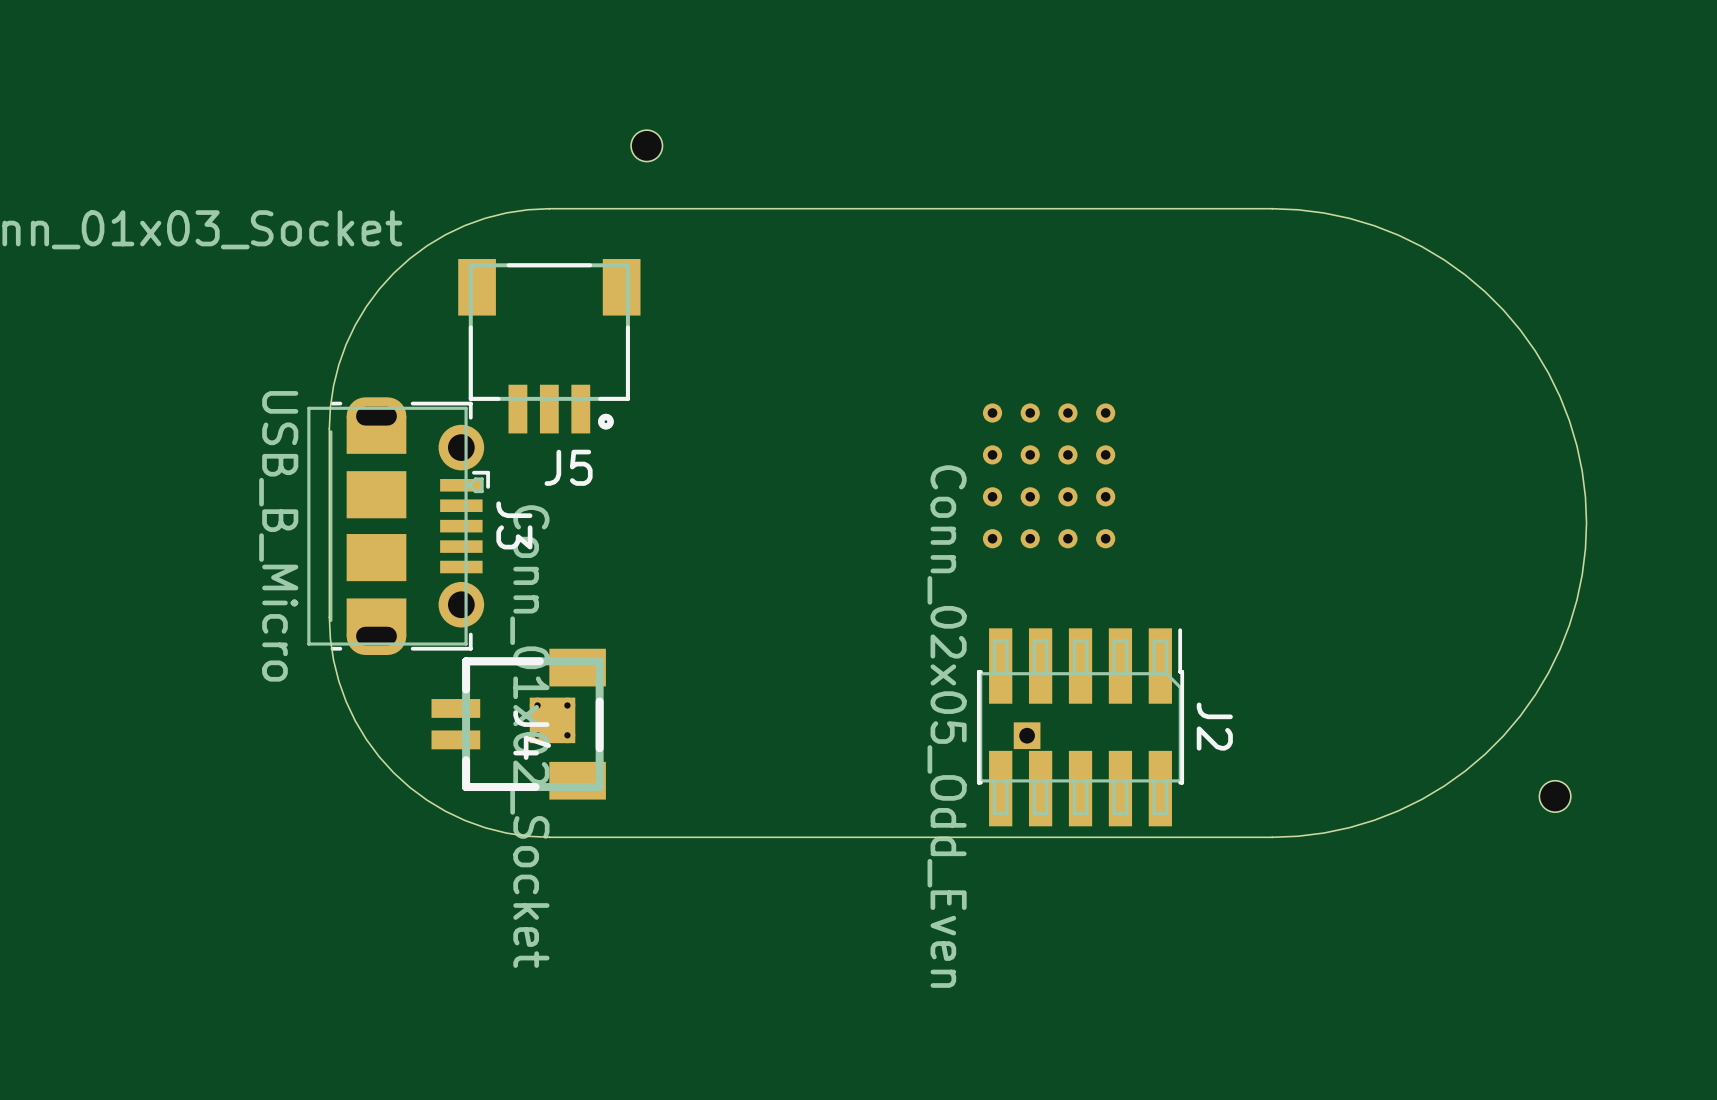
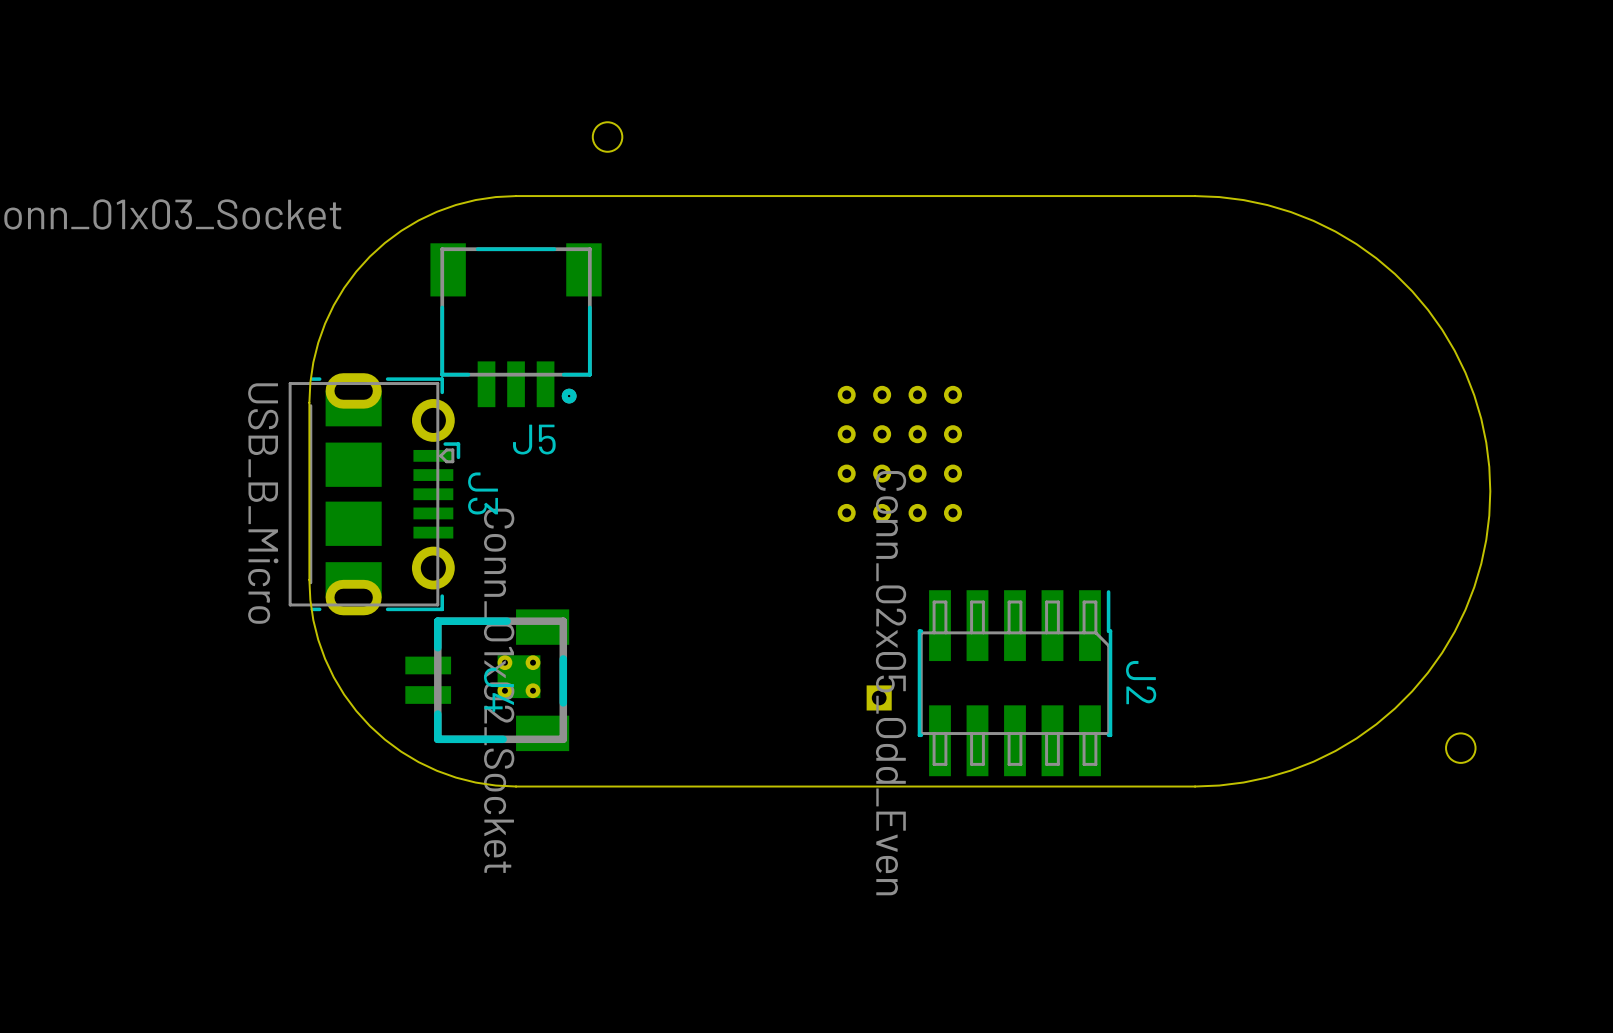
part position: (1049, 475) -> (899, 453)
part position: (1027, 735) -> (879, 697)

